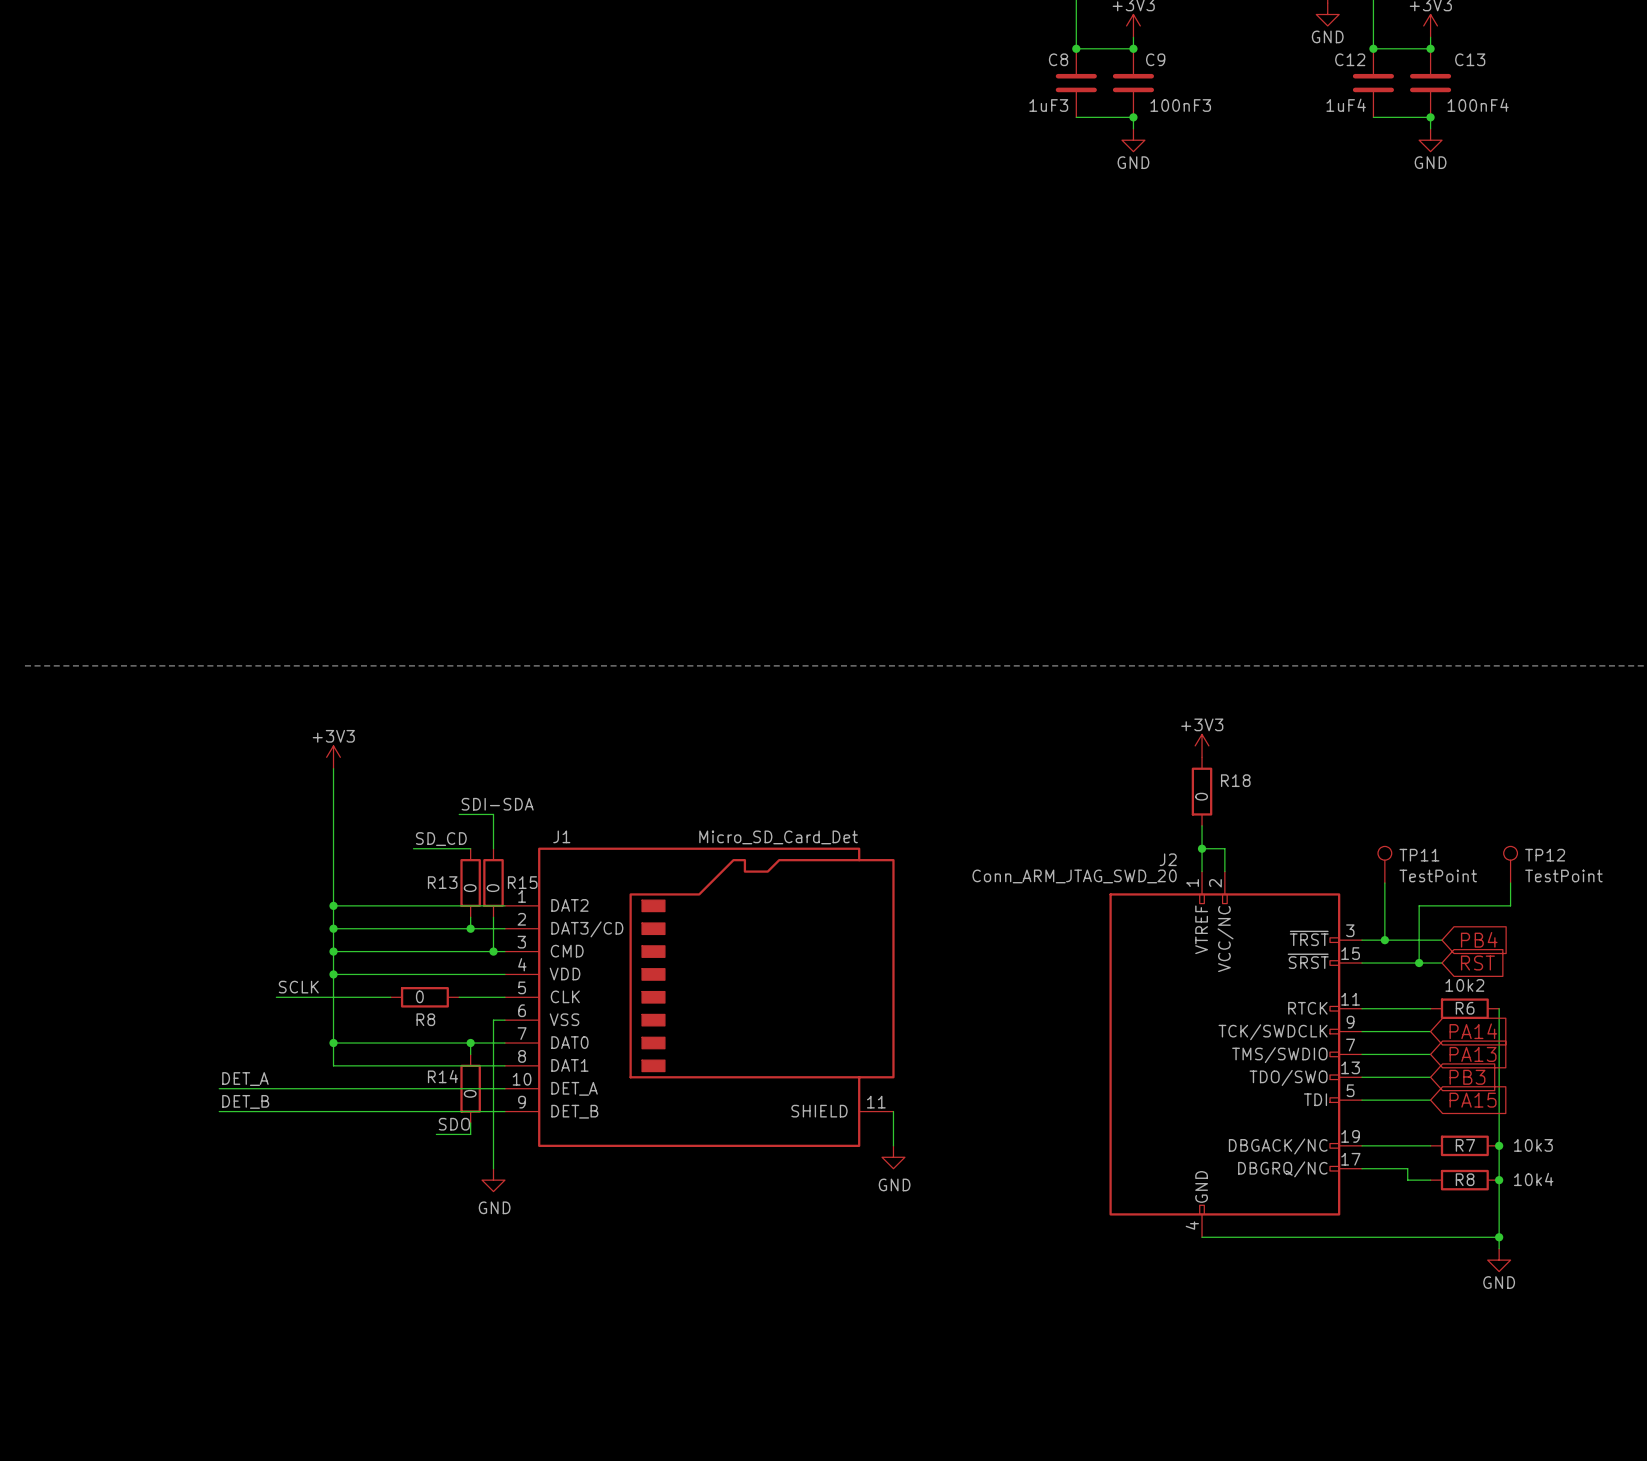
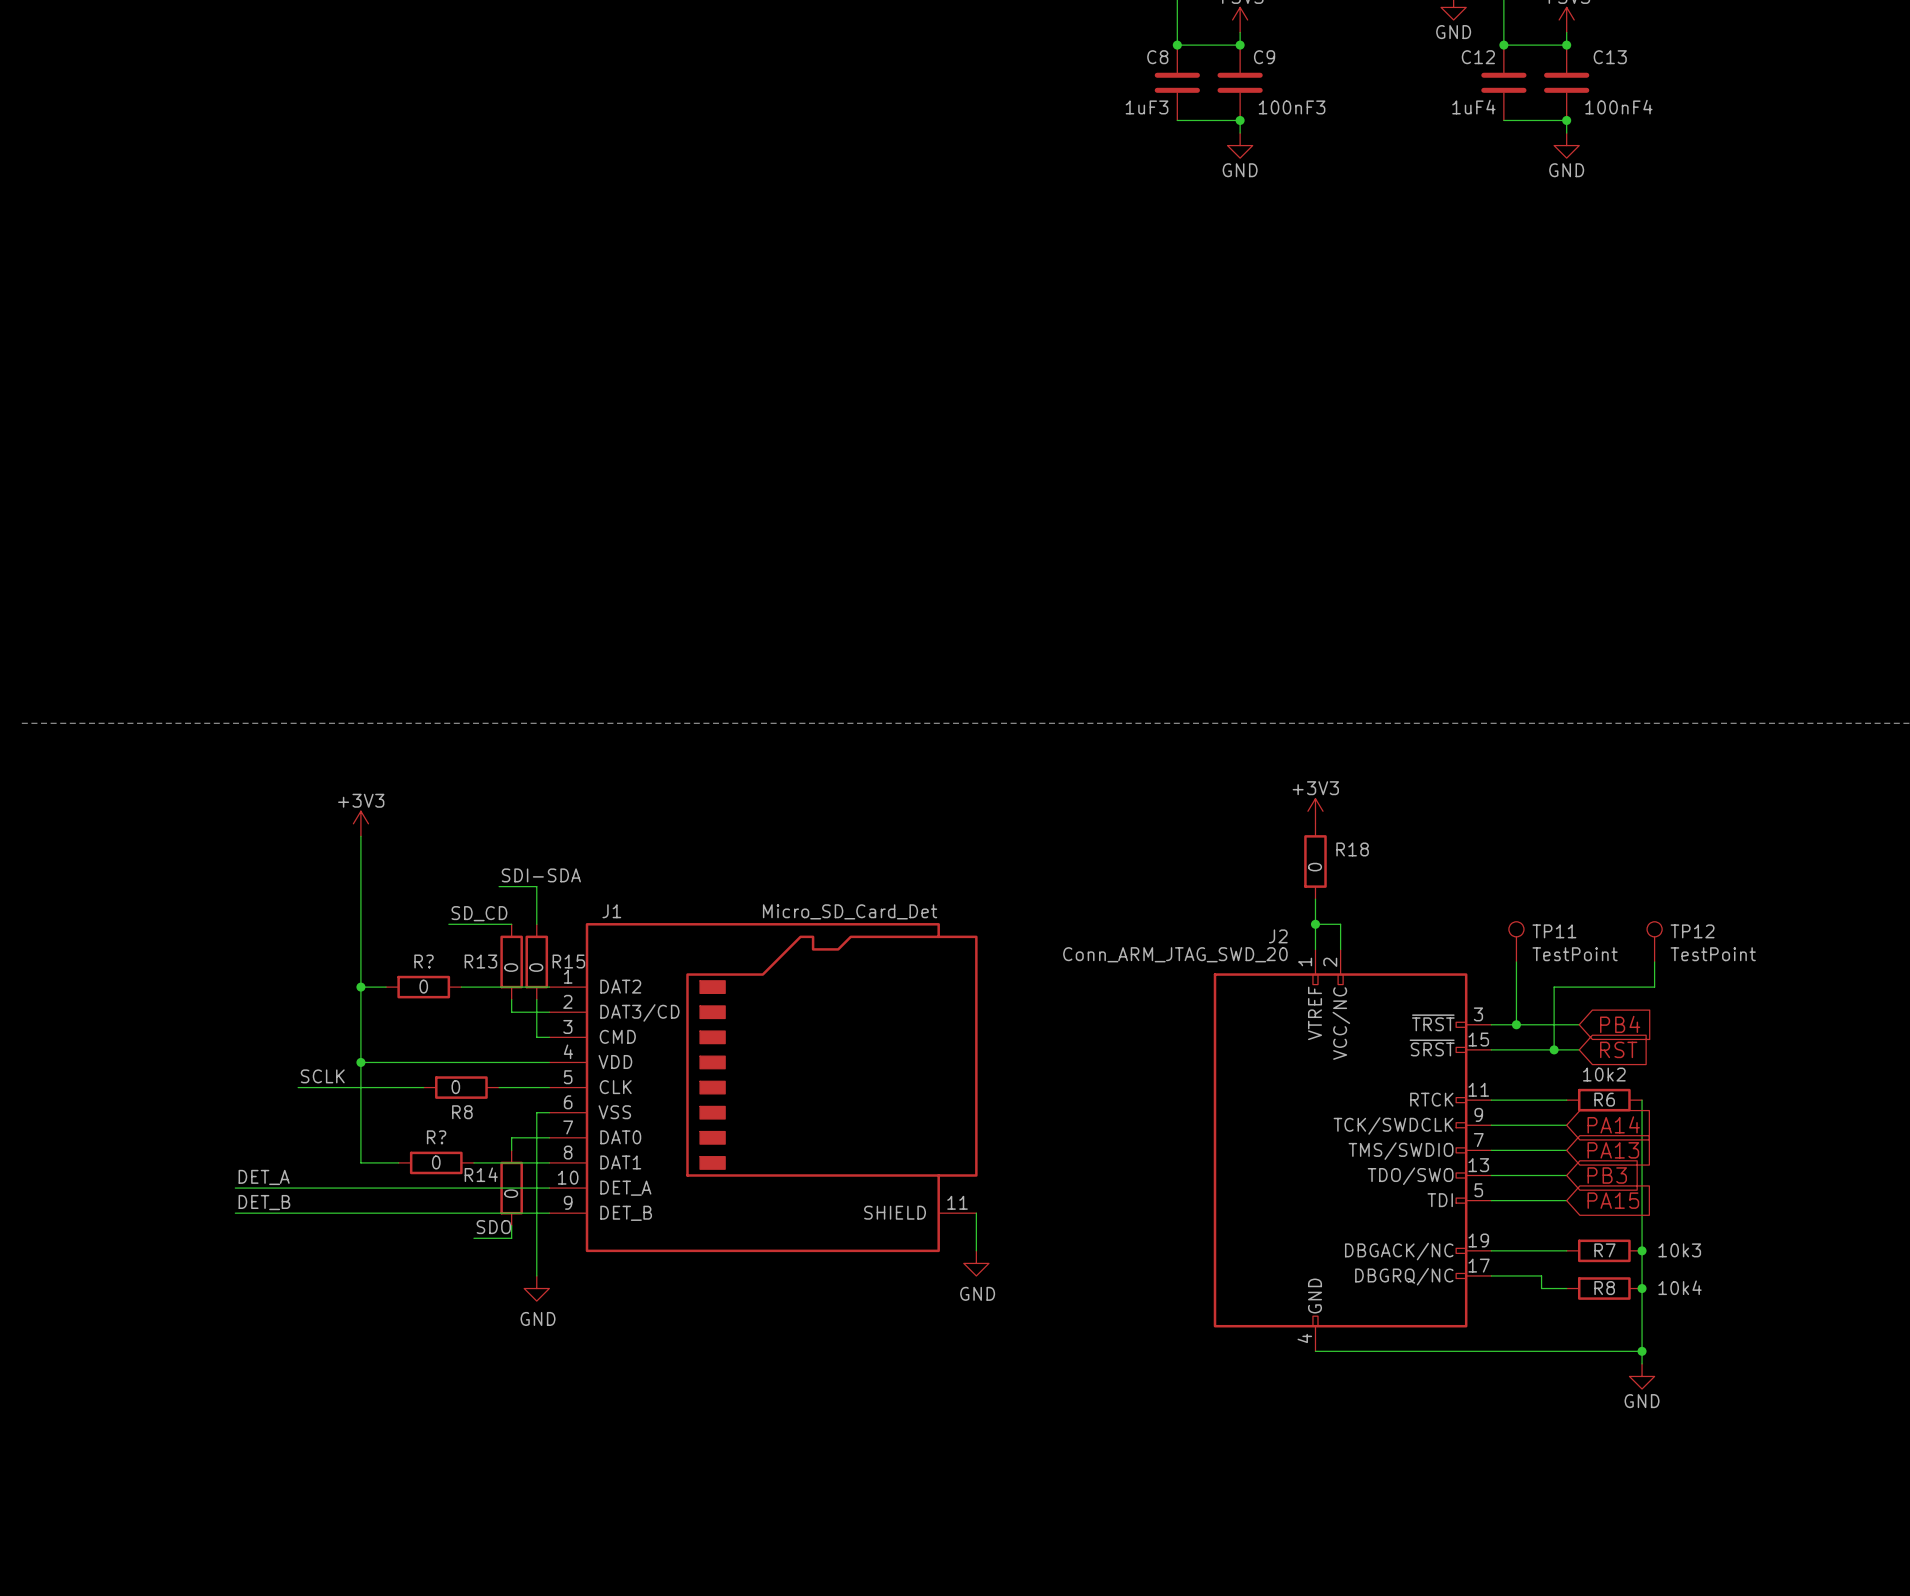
wire: (356, 905) (424, 905) -> none
R?: none -> 0 (423, 987)
wire: (333, 928) (470, 928) -> none
junction: (333, 928) -> none
junction: (470, 928) -> none
wire: (333, 951) (493, 951) -> none
junction: (333, 951) -> none
junction: (493, 951) -> none
wire: (333, 1043) (470, 1043) -> none
junction: (333, 1043) -> none
junction: (470, 1043) -> none
wire: (367, 1065) (436, 1065) -> none
R?: none -> 0 (436, 1162)

